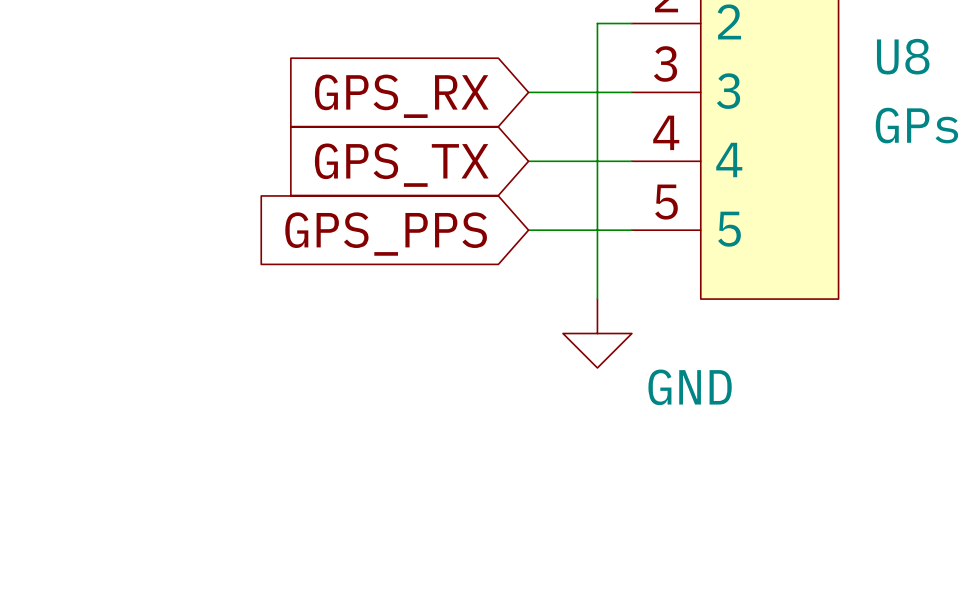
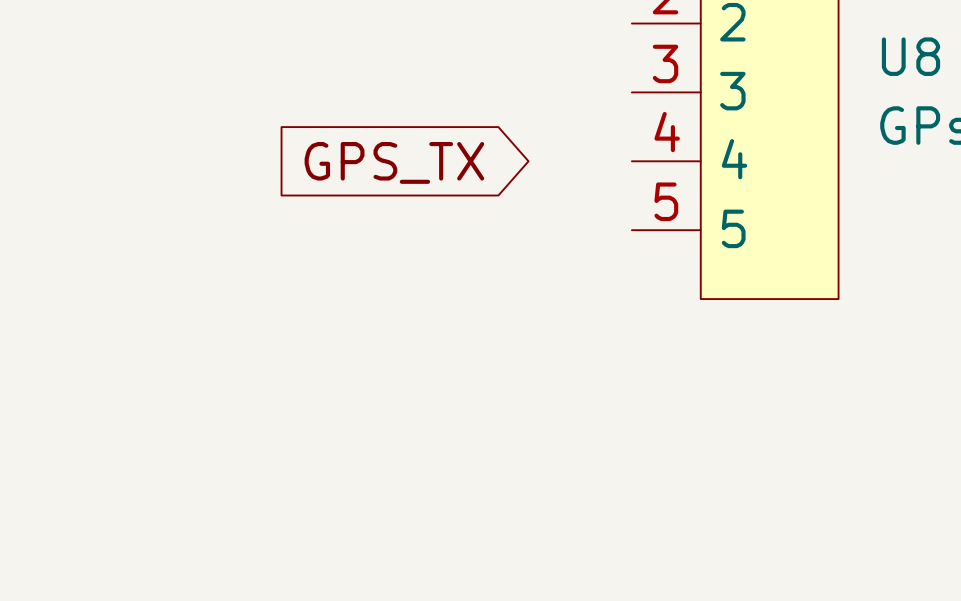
wire: (631, 23) (597, 23) (597, 299) -> none
wire: (528, 92) (631, 92) -> none
global label: GPS_RX (401, 96) -> none
wire: (528, 161) (631, 161) -> none
wire: (528, 230) (631, 230) -> none
global label: GPS_PPS (386, 234) -> none
power symbol: GND (597, 333) -> none

